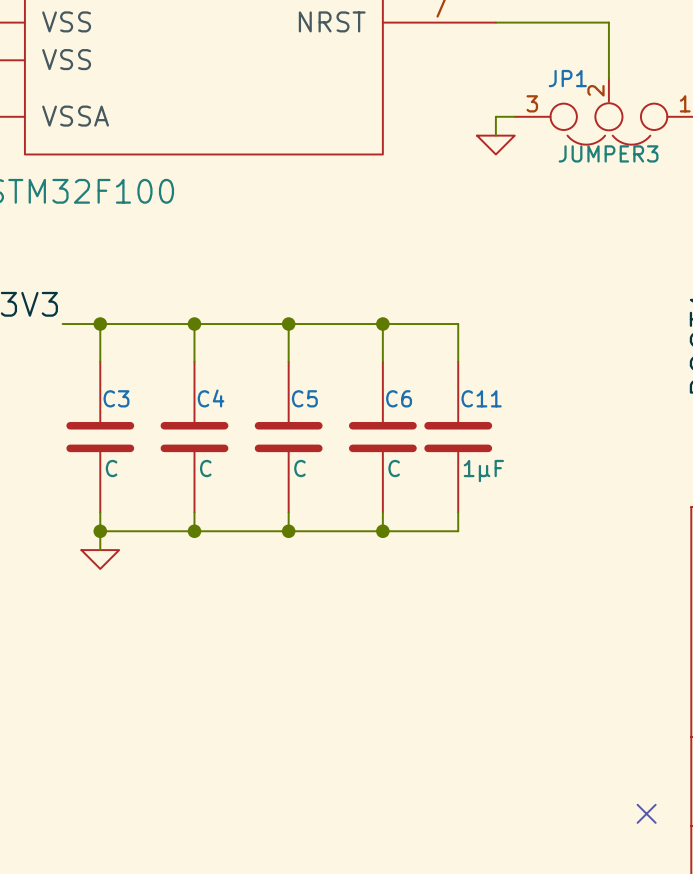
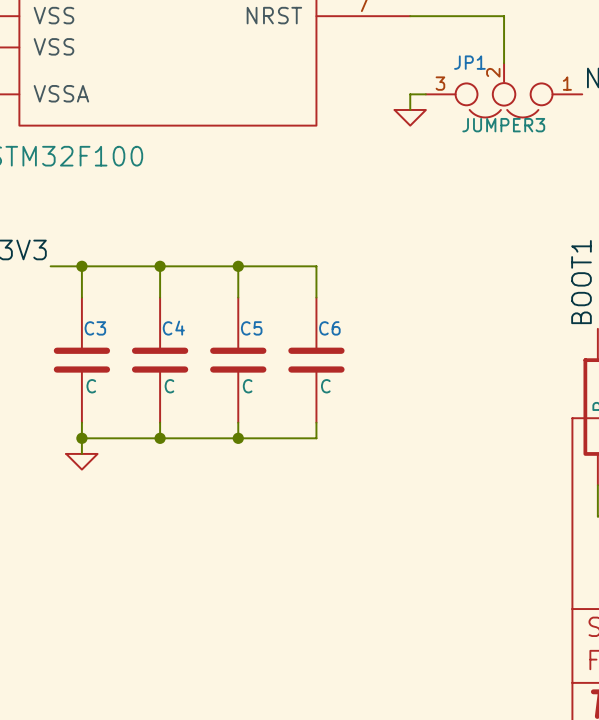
wire: (382, 324) (458, 324) (458, 361) -> none
junction: (382, 324) -> none
C11: 1µF (458, 437) -> none
wire: (458, 512) (458, 531) (382, 531) -> none
junction: (382, 531) -> none
no-connect mark: (646, 813) -> none

